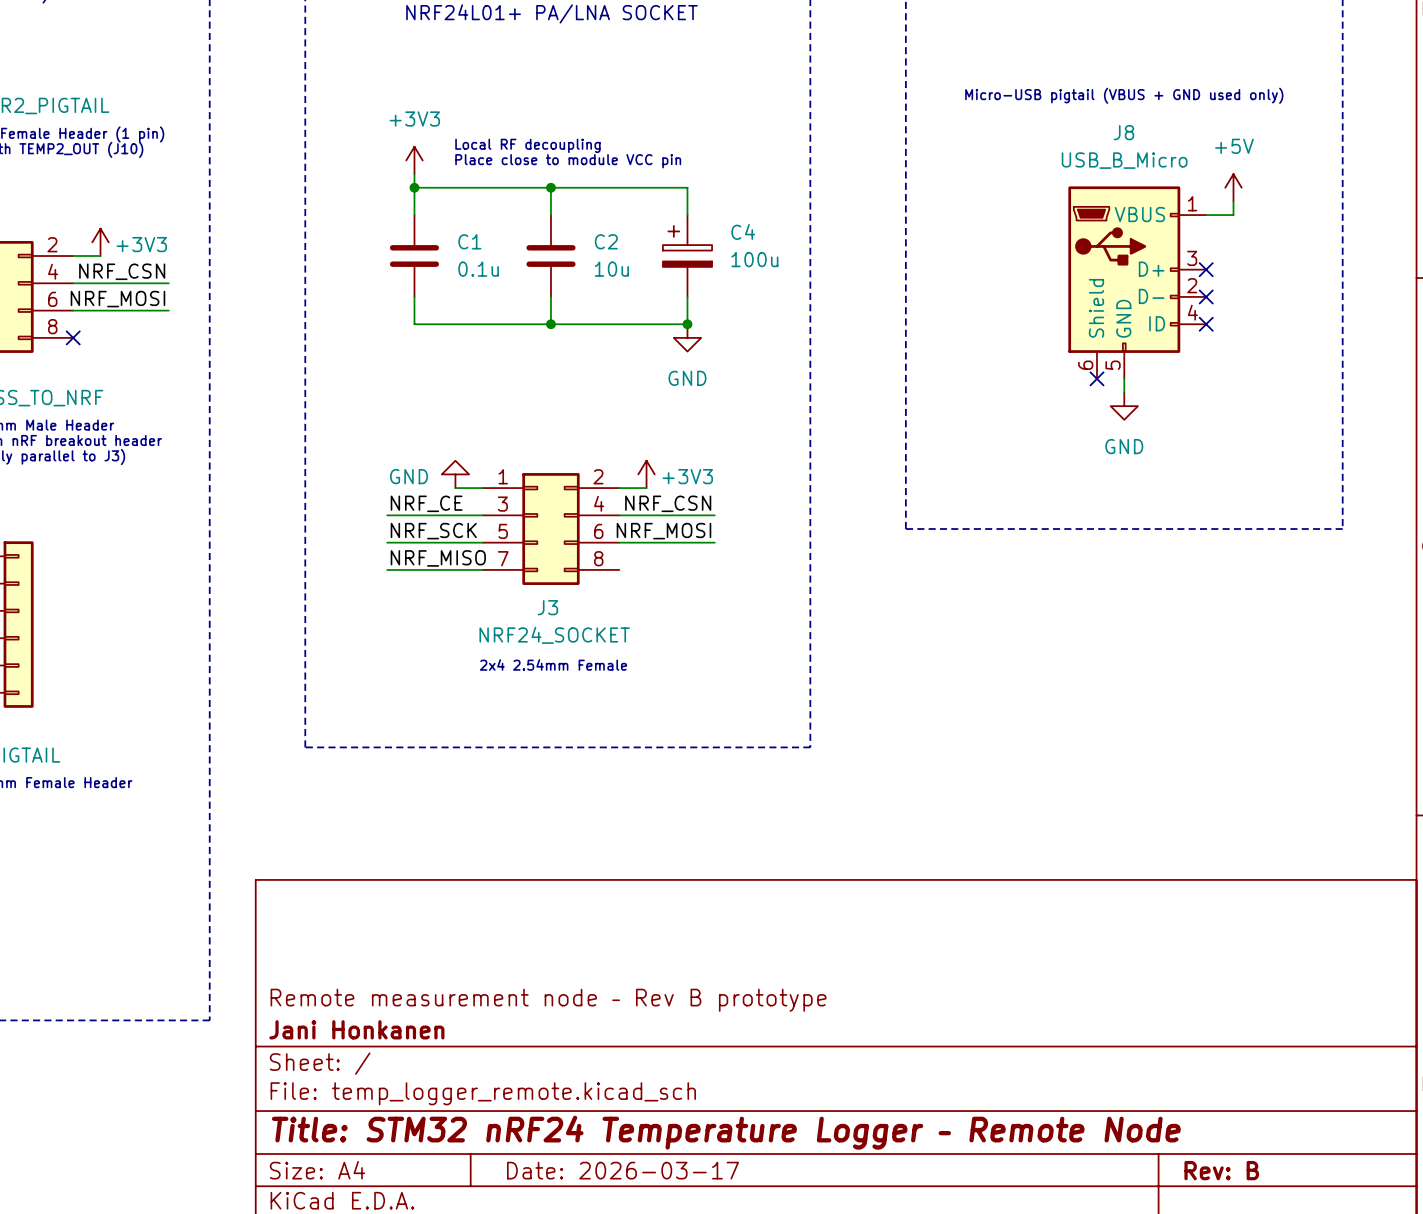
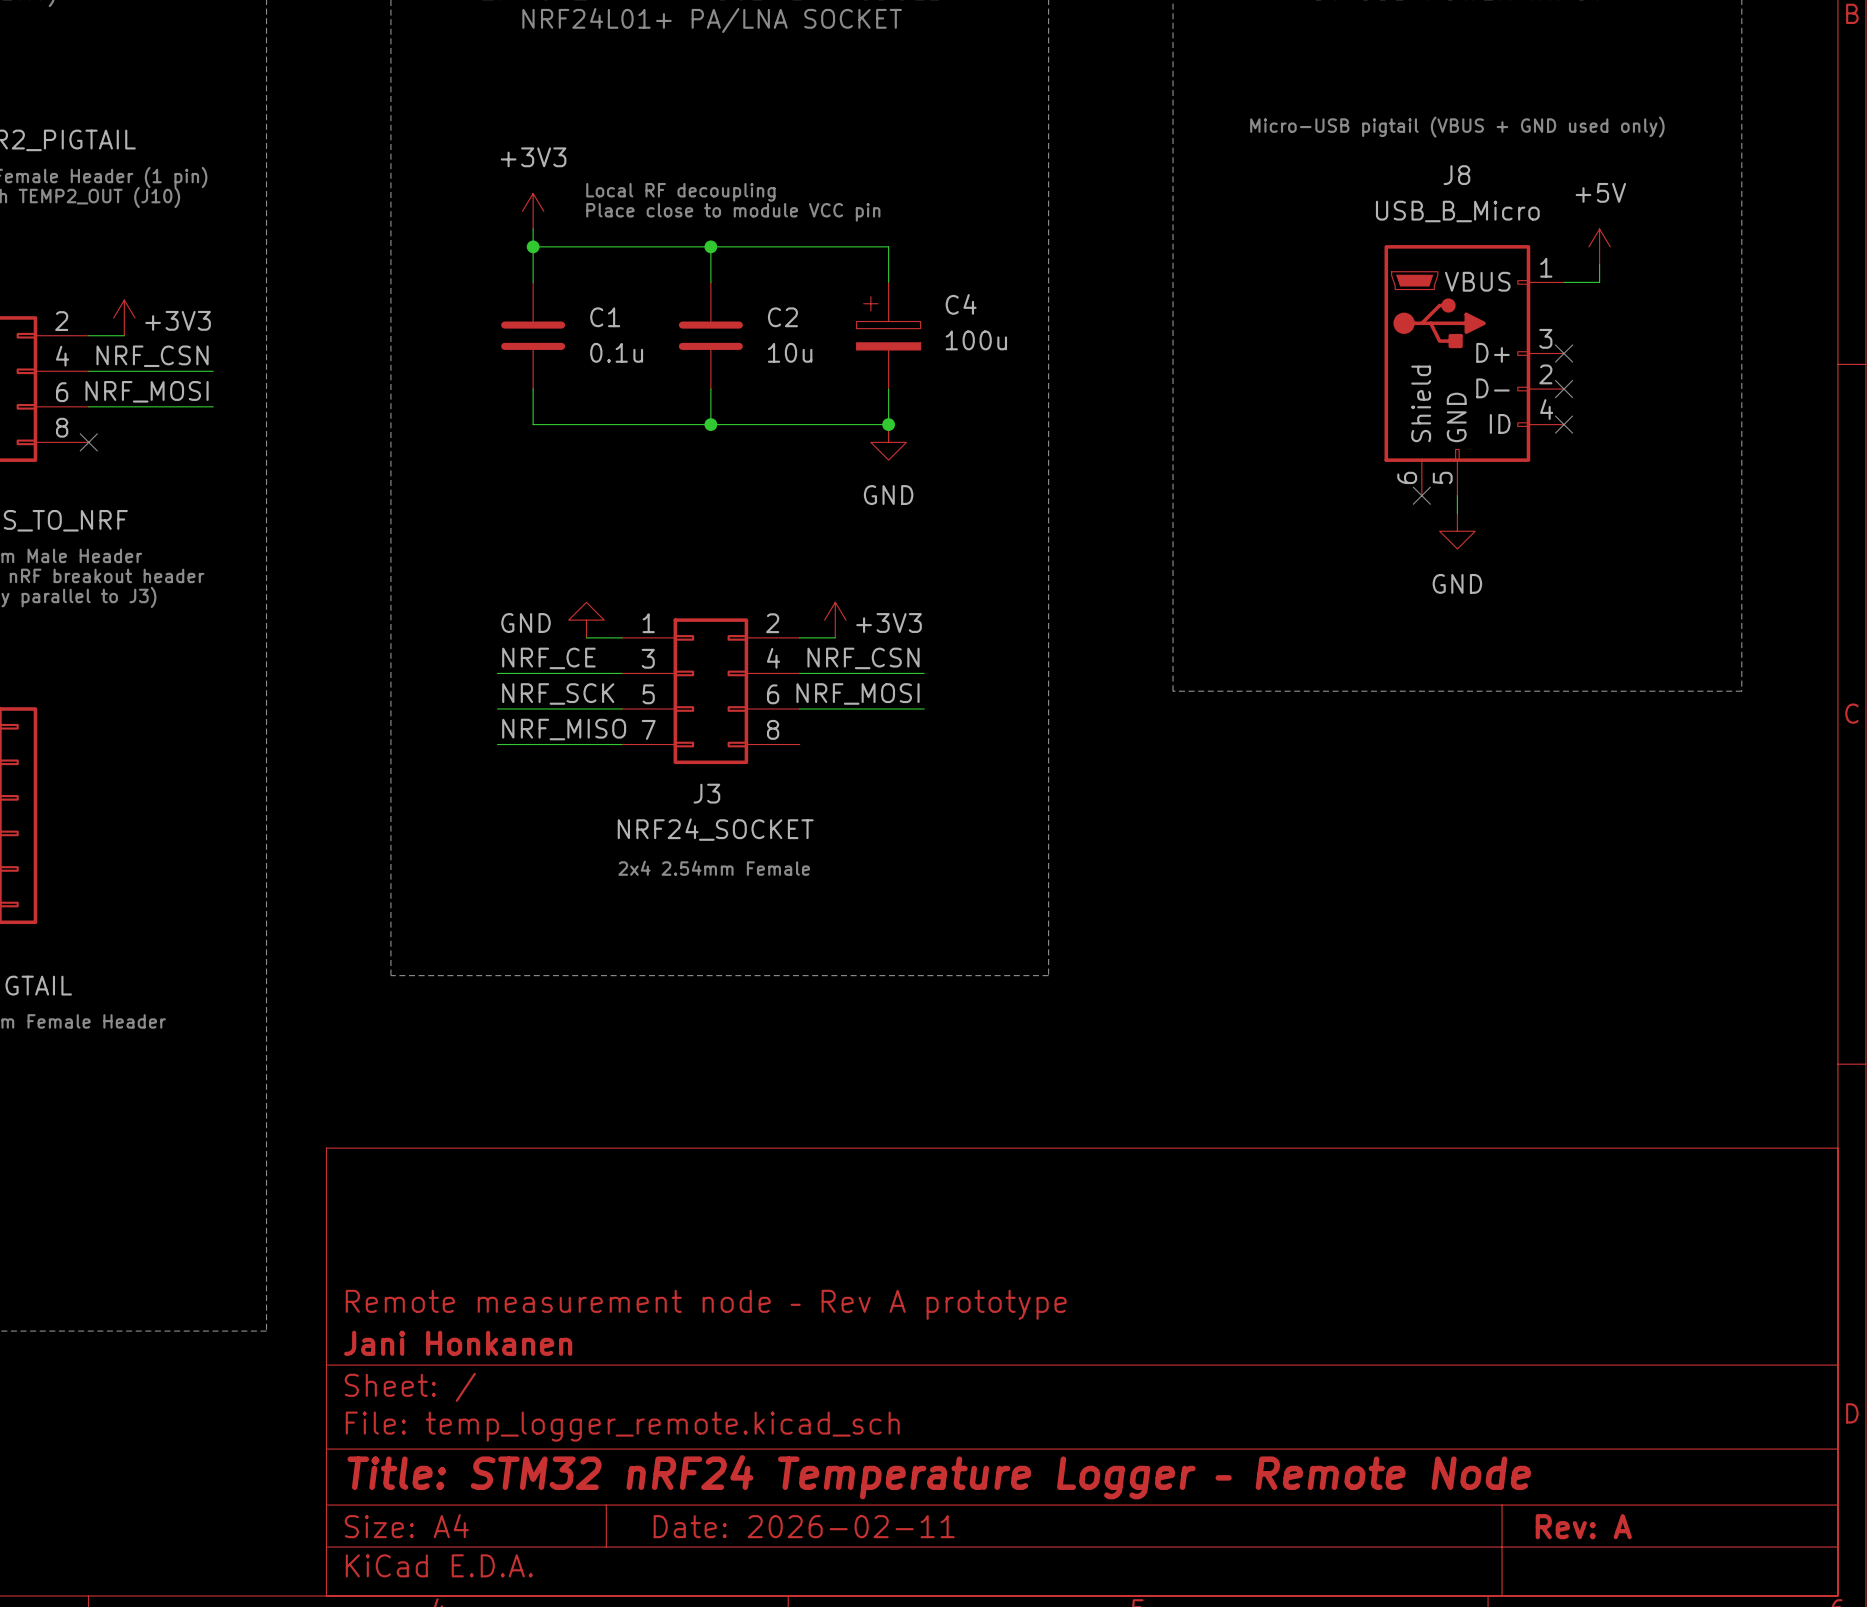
title block: Remote measurement node – Rev B prototype (548, 1000) -> Remote measurement node – Rev A prototype (706, 1304)
title block: Date: 2026-03-17 (623, 1170) -> Date: 2026-02-11 (804, 1526)
title block: Rev: B (1221, 1170) -> Rev: A (1583, 1526)

